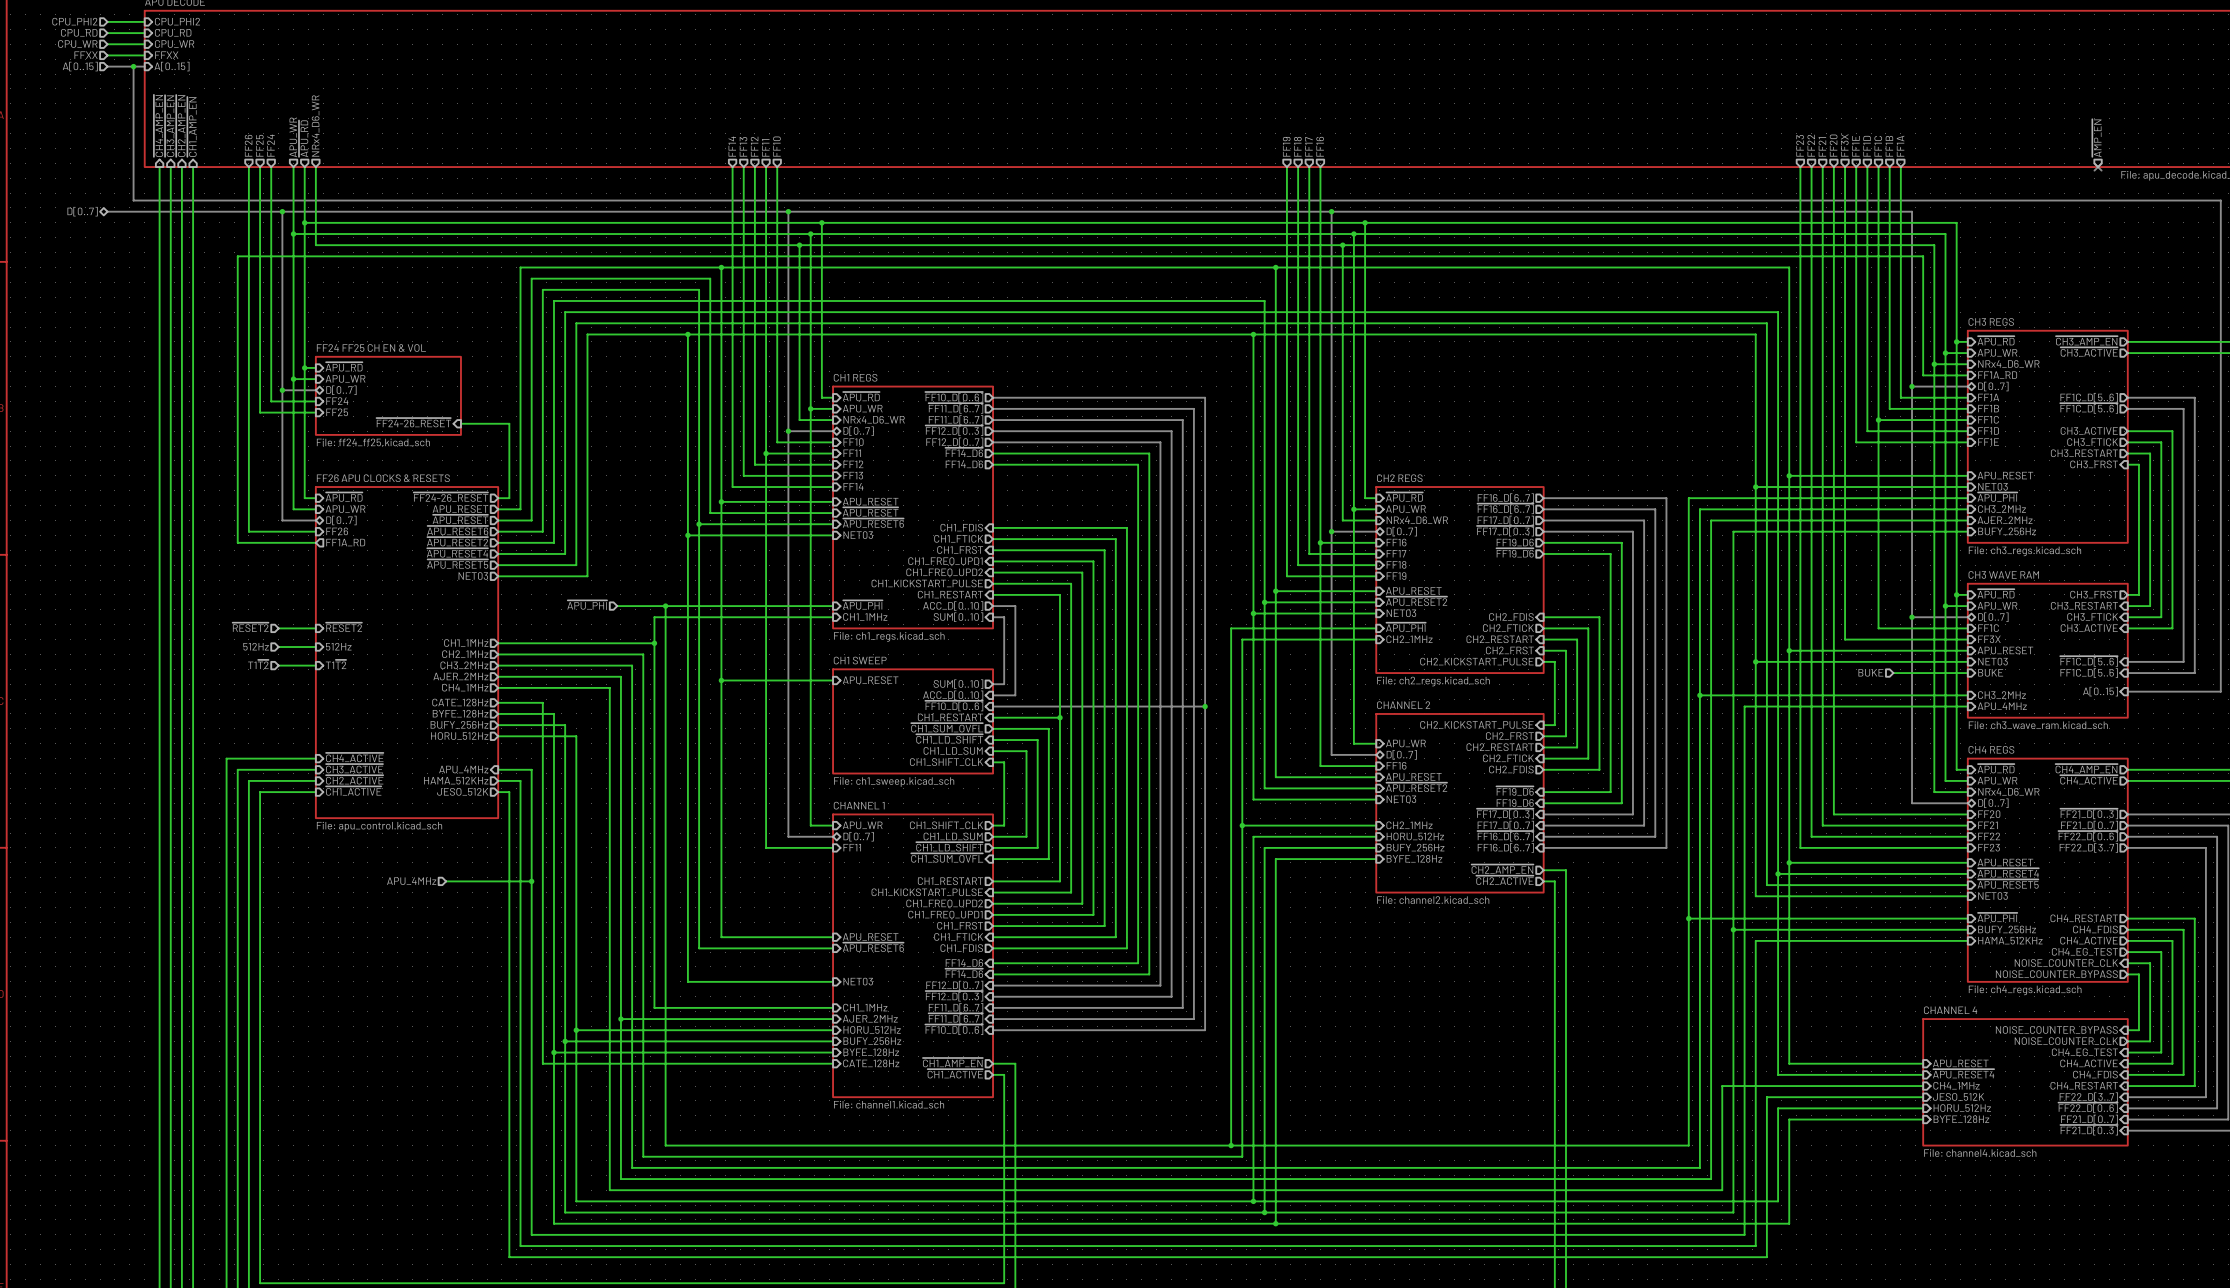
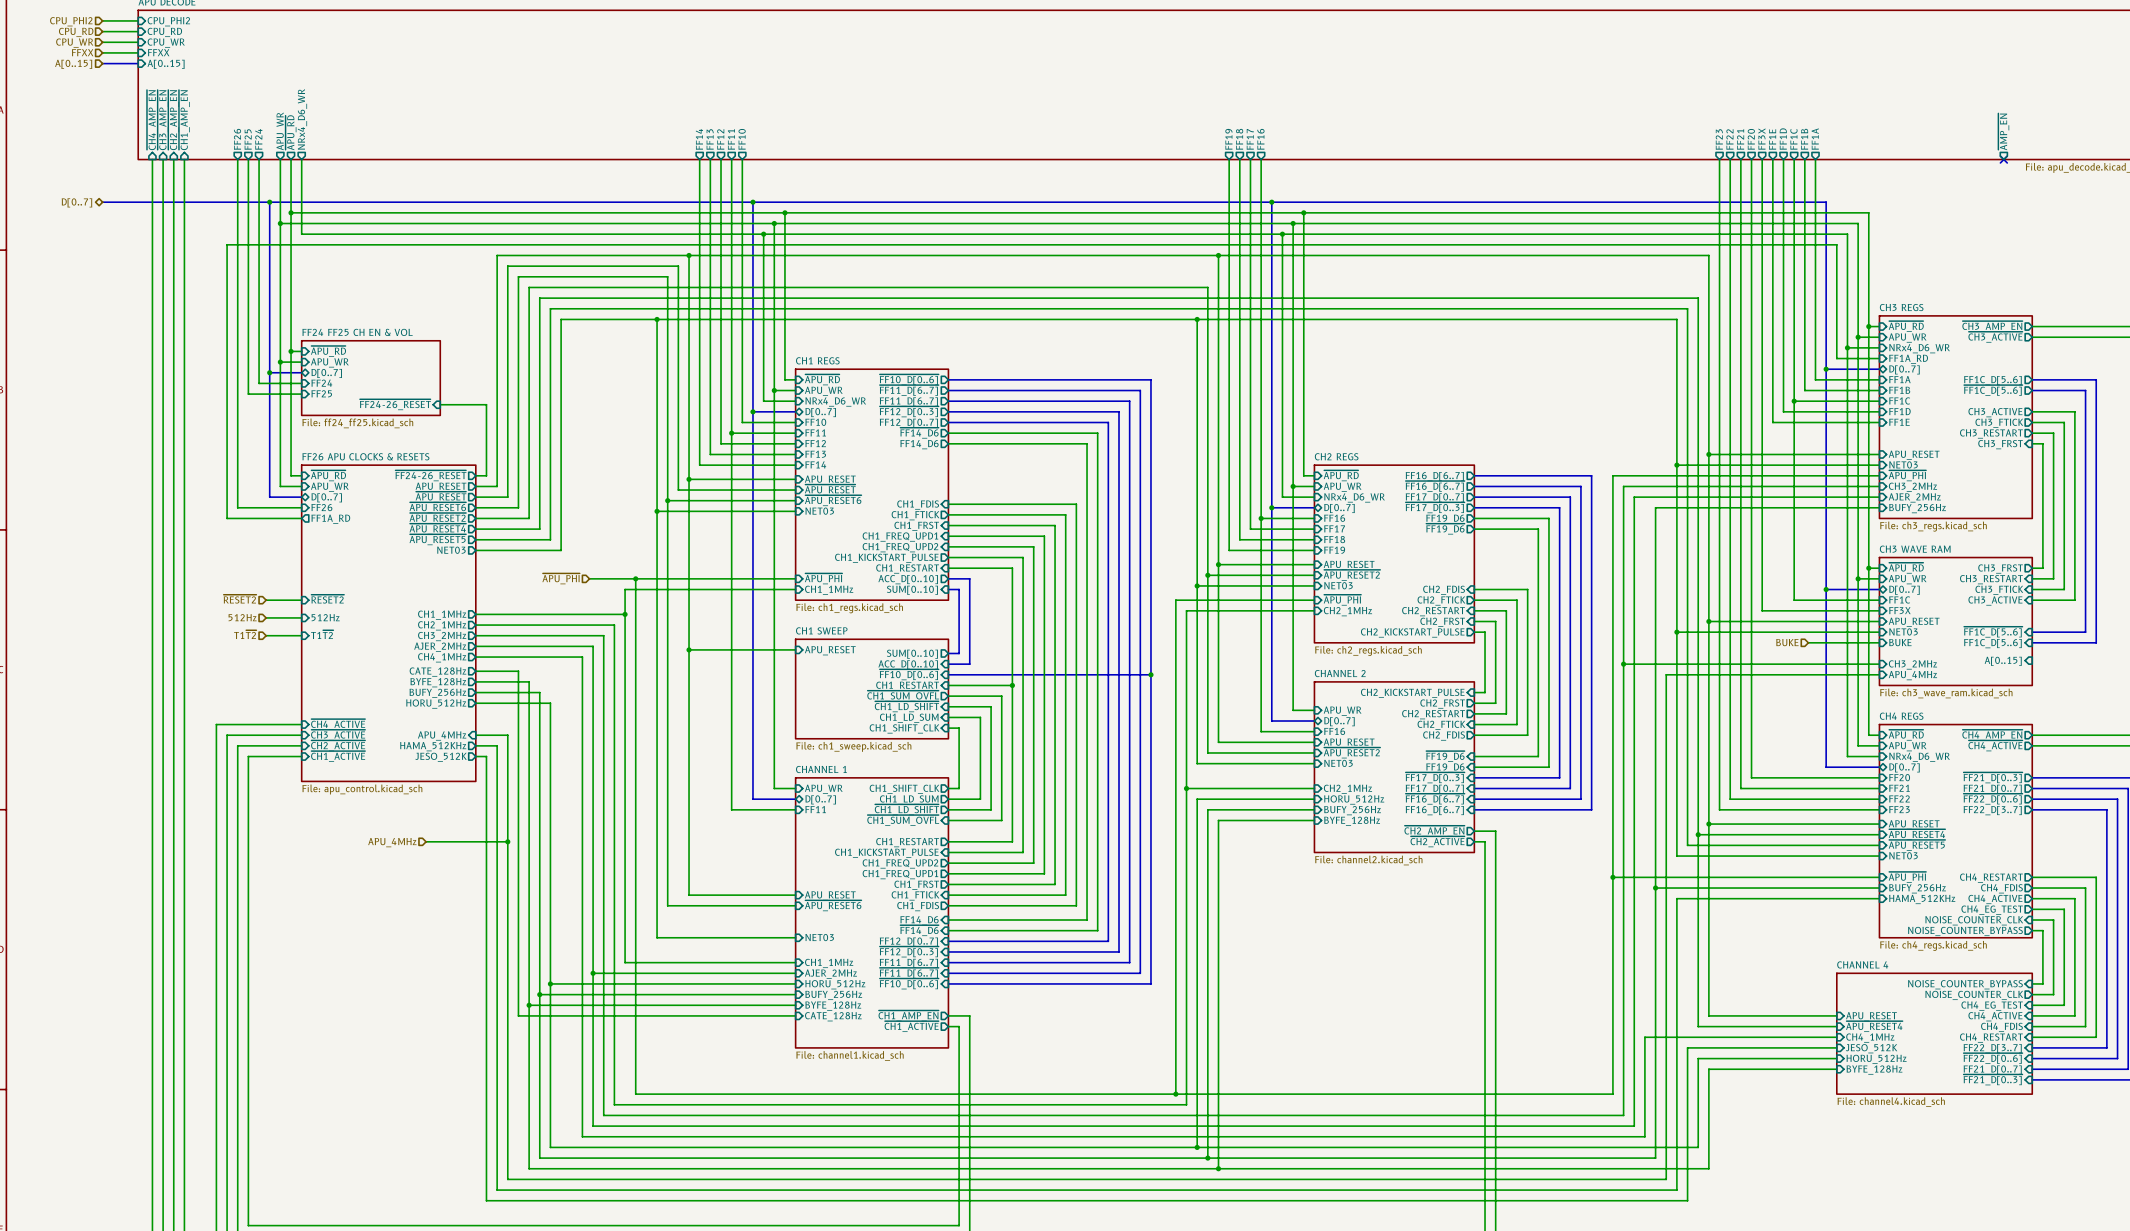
bus: (133, 66) (133, 200) (2220, 200) (2220, 691) (2127, 691) -> none
junction: (133, 66) -> none

